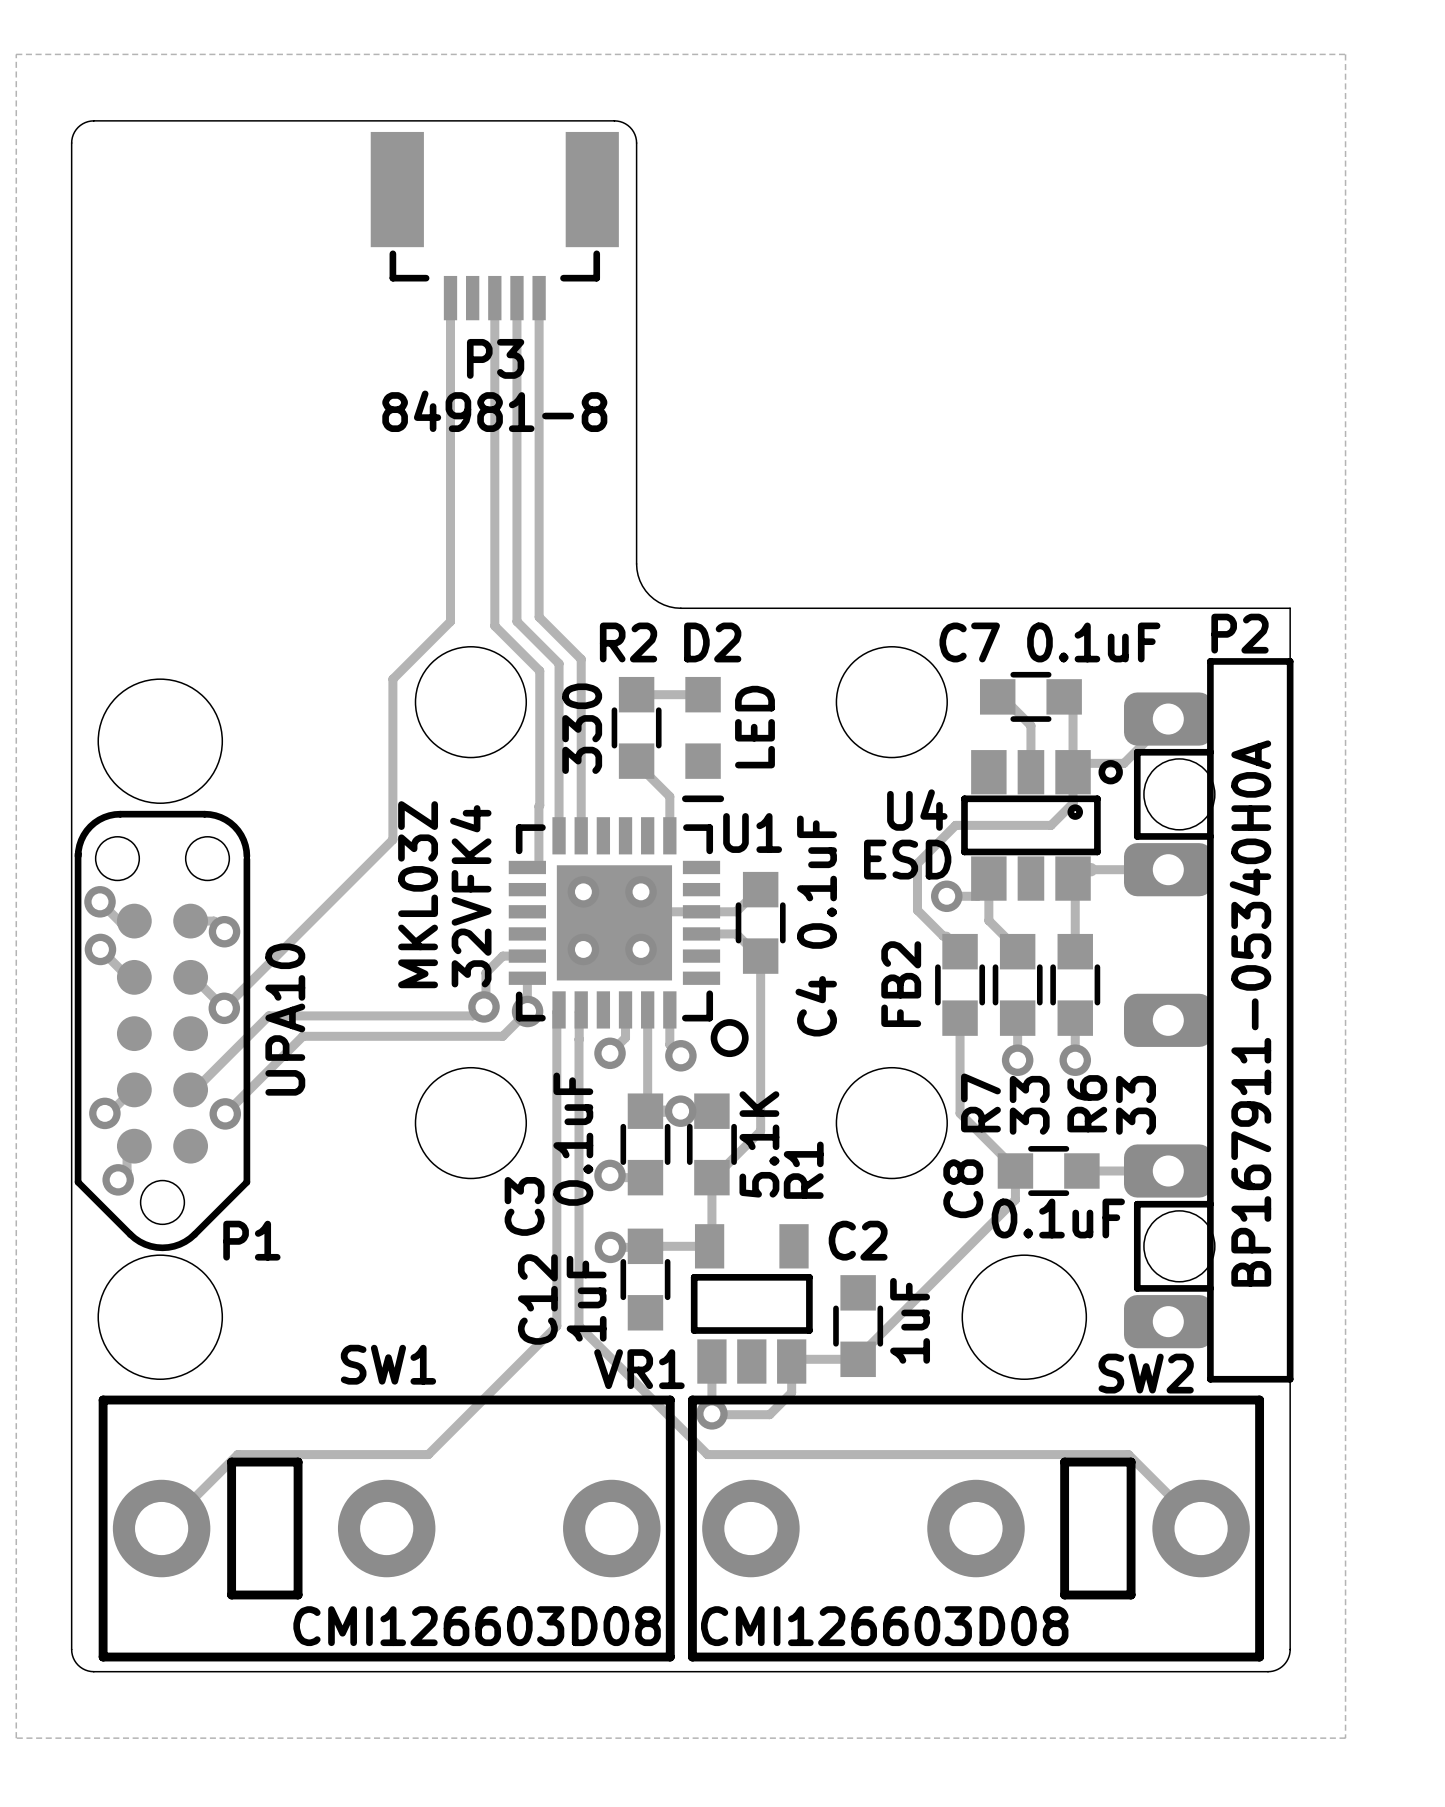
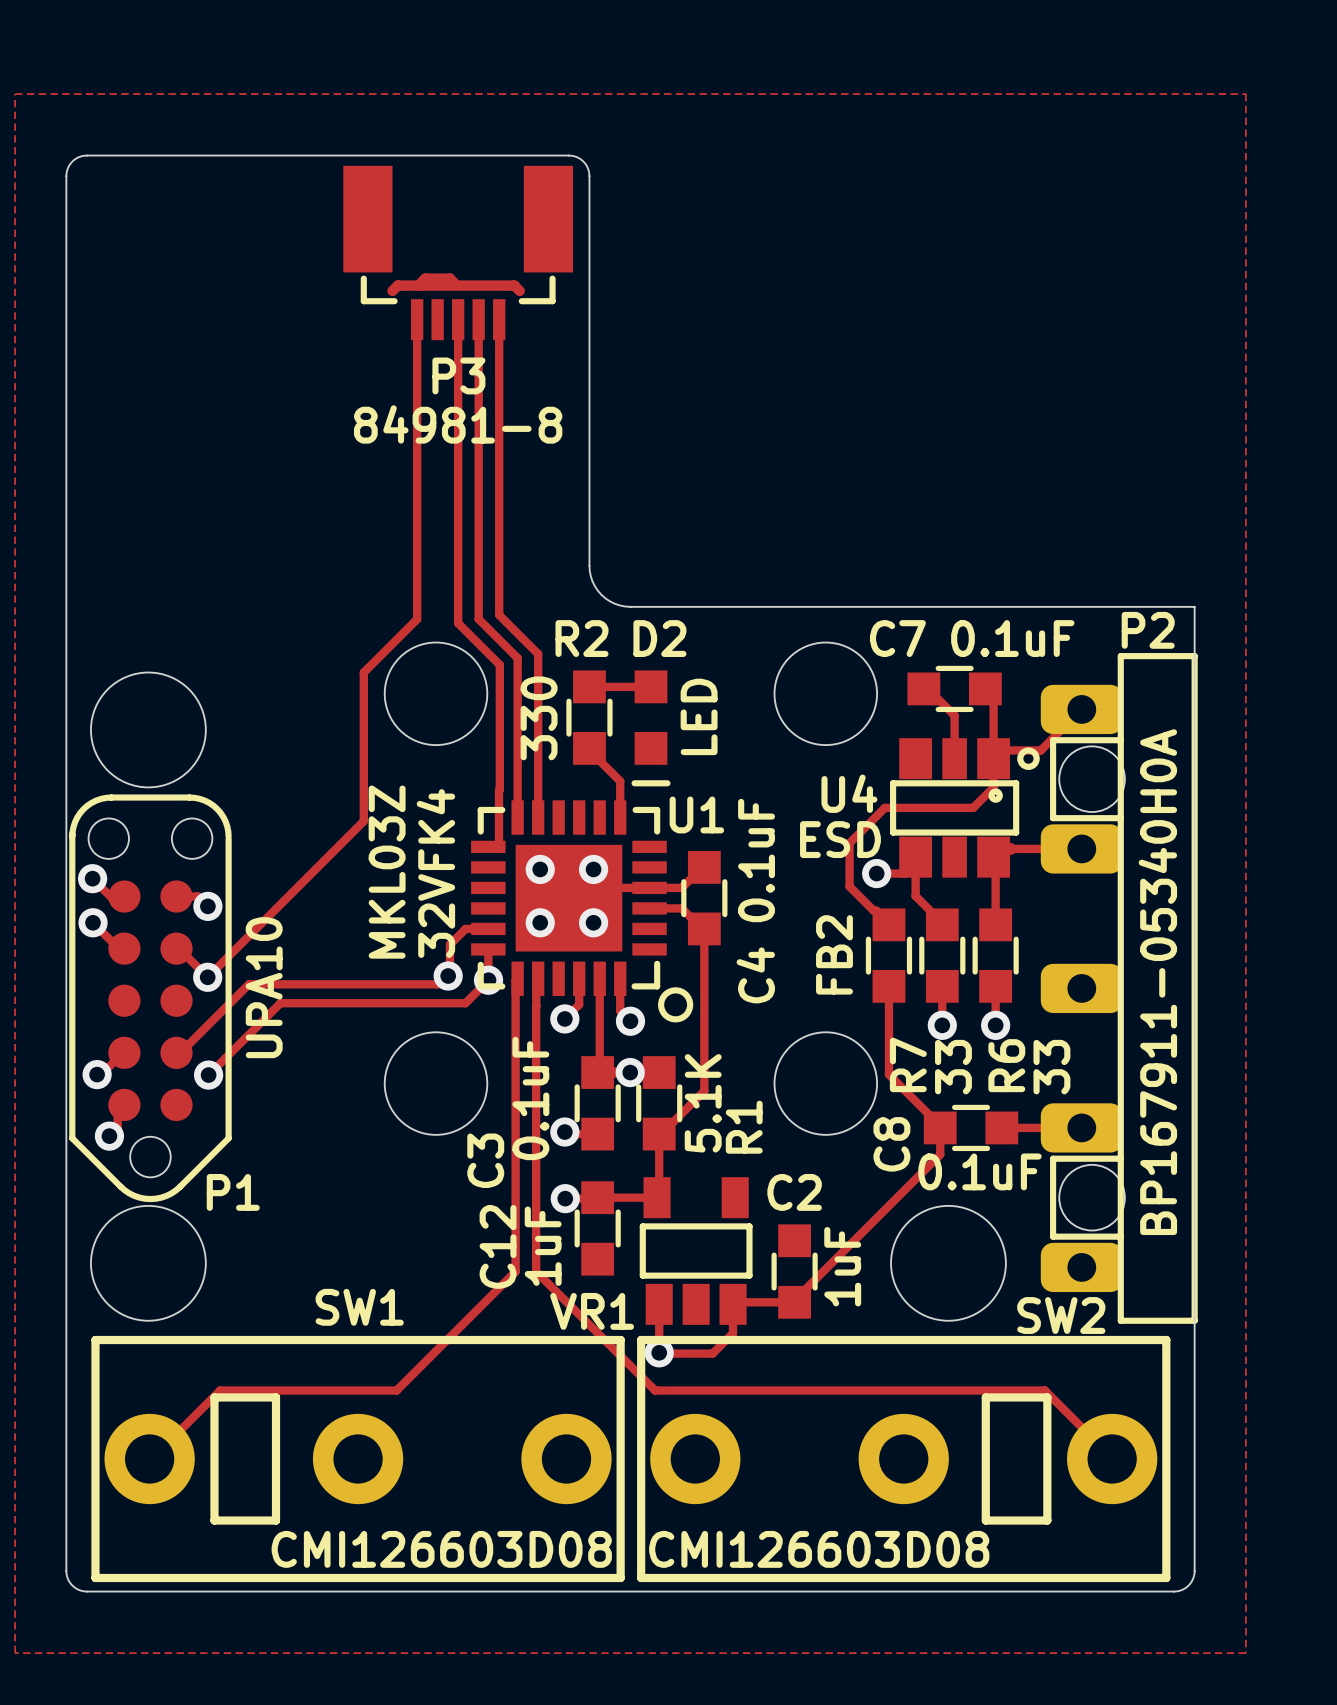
track: none -> (454, 282) (449, 278) (425, 278) (418, 285)
track: none -> (392, 290) (397, 285) (514, 285) (519, 290)

